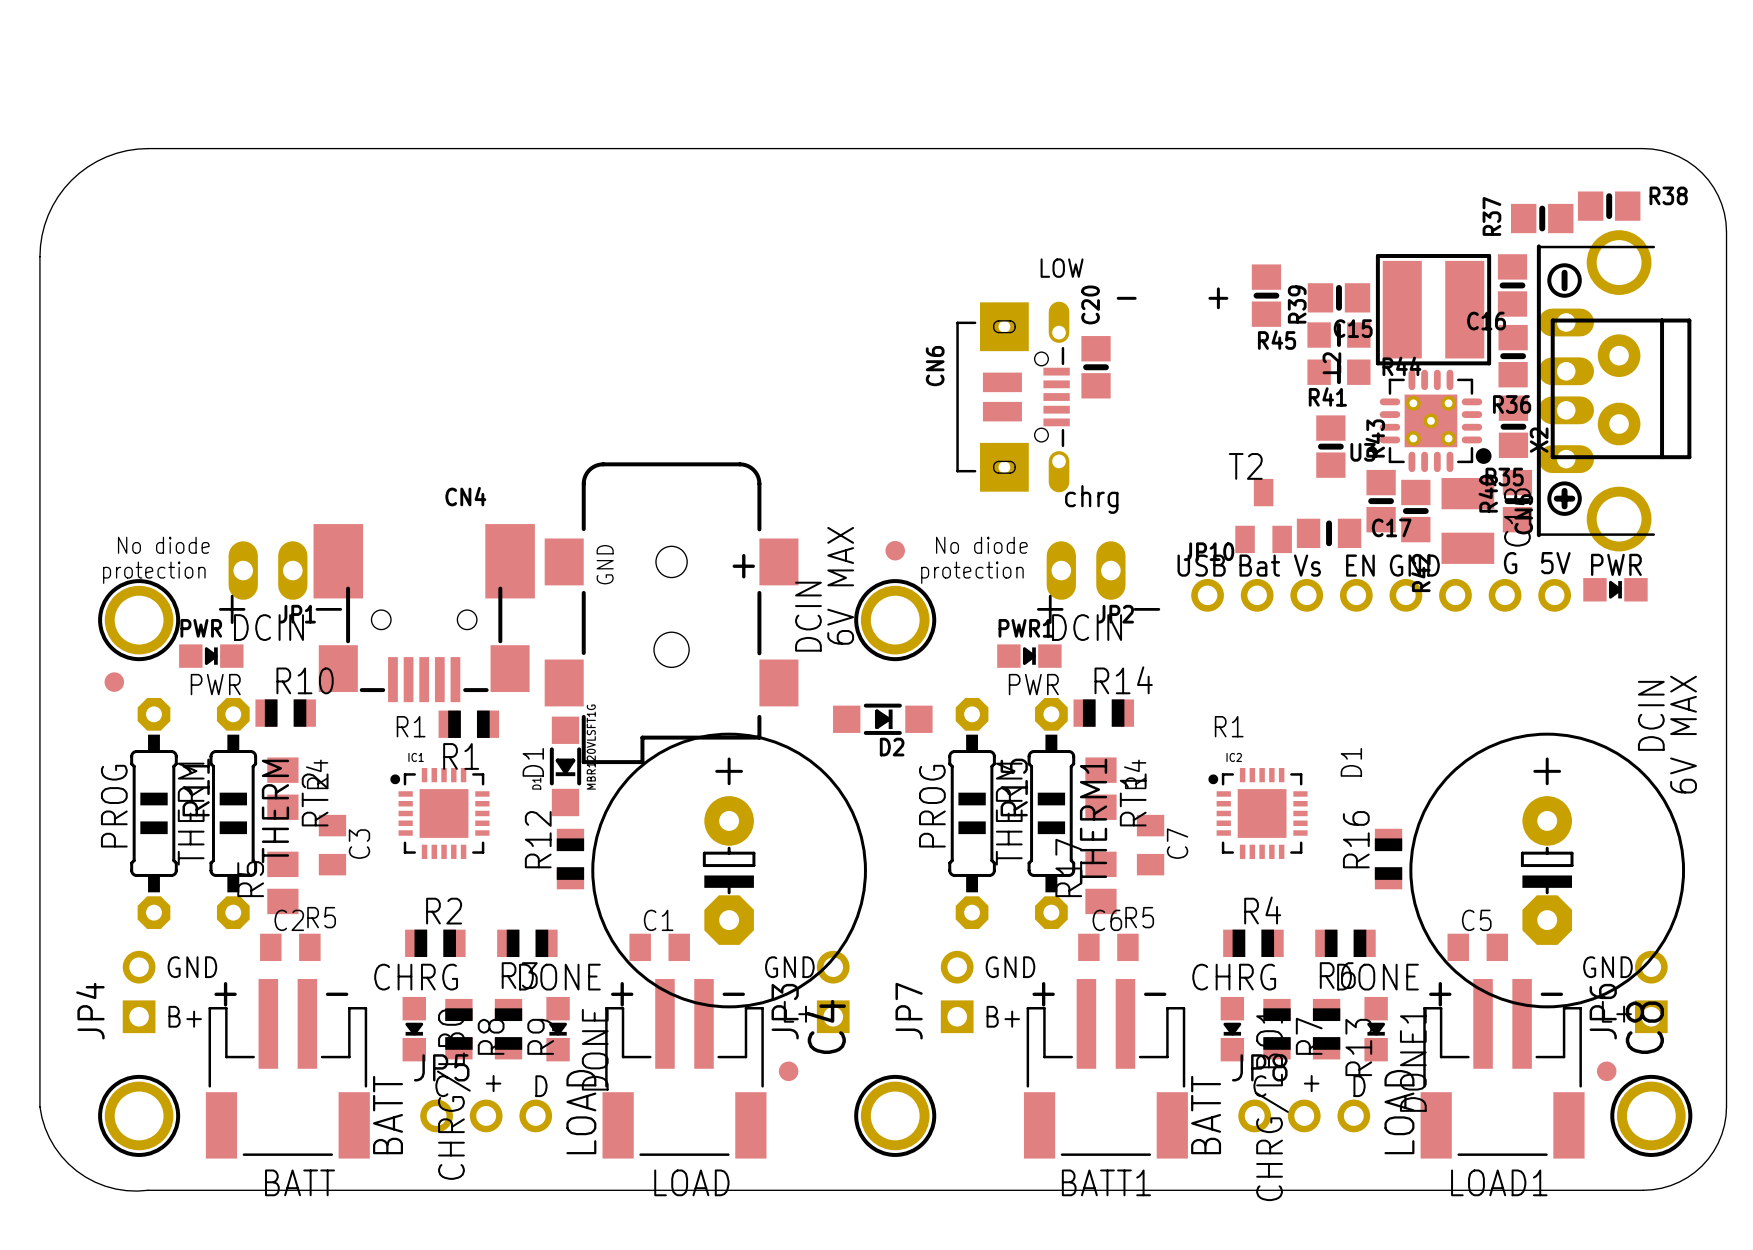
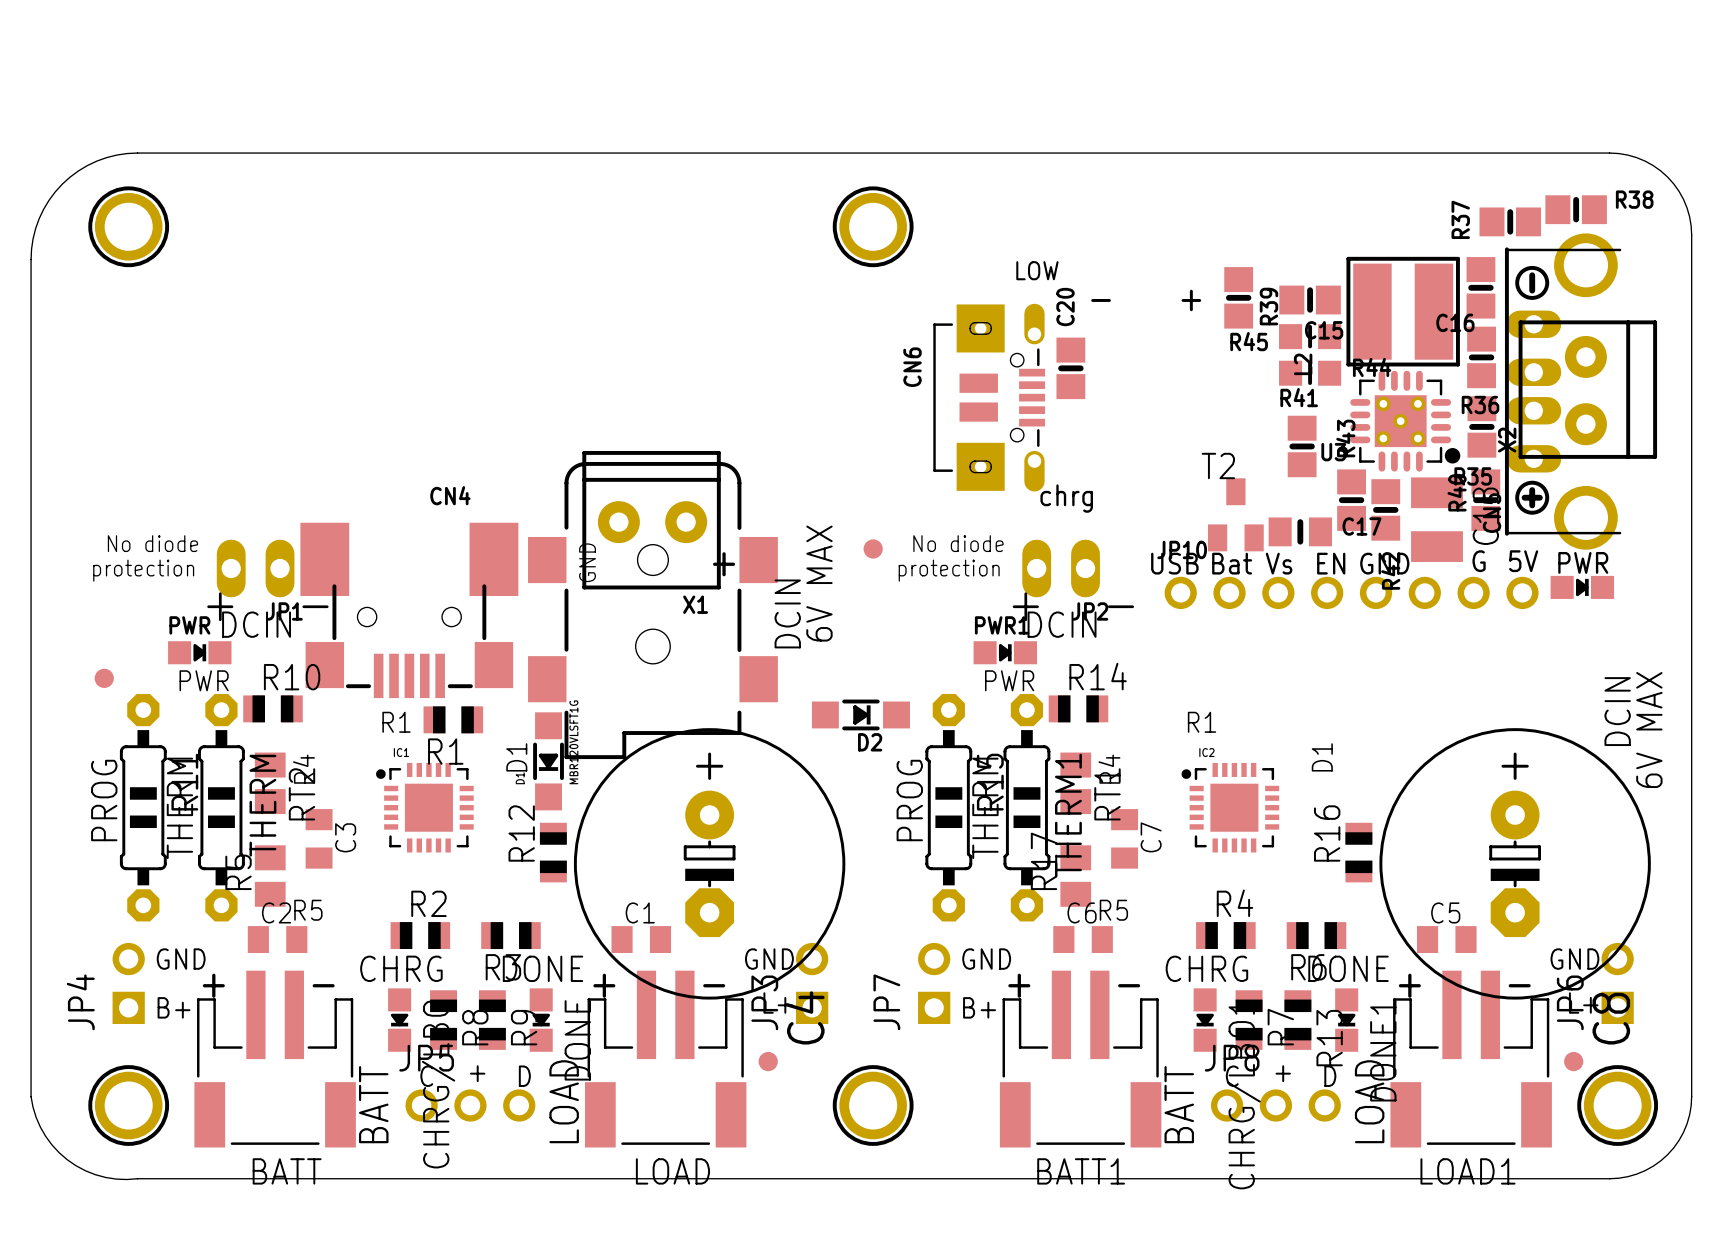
X1: none -> (651, 520)
part position: (139, 620) -> (128, 226)
part position: (895, 620) -> (873, 226)

